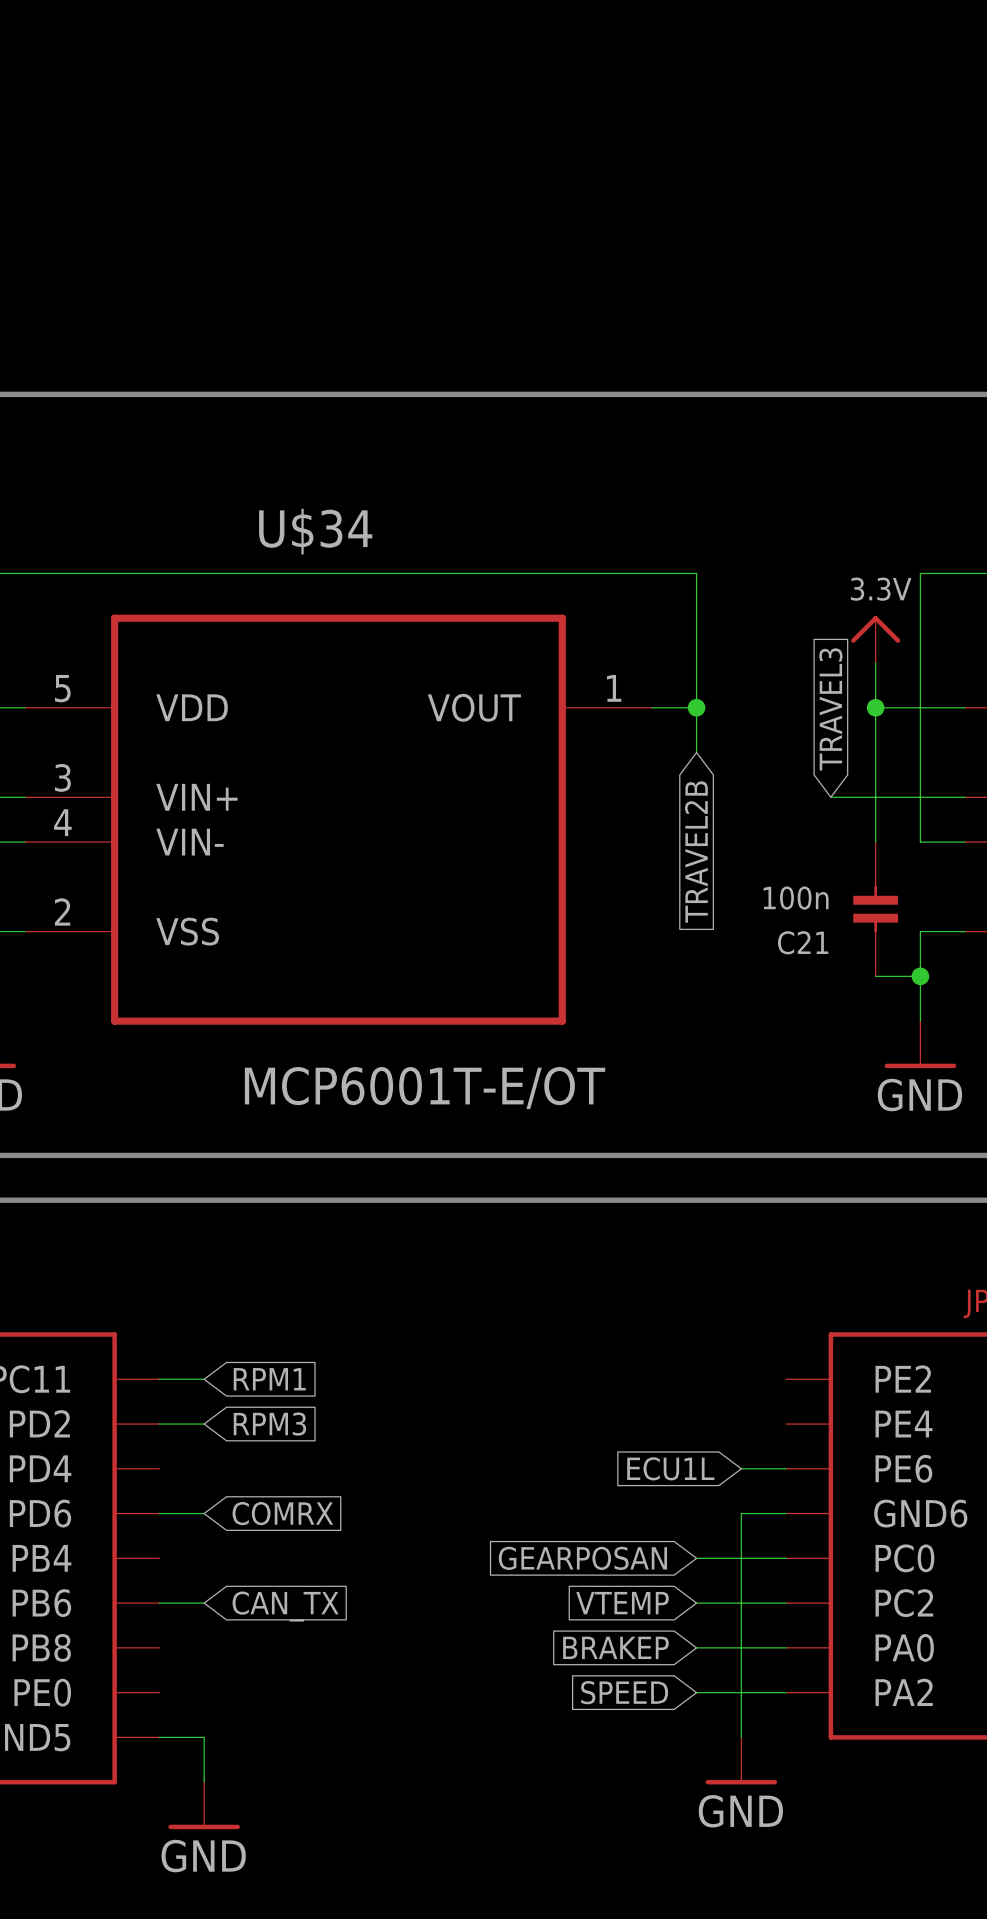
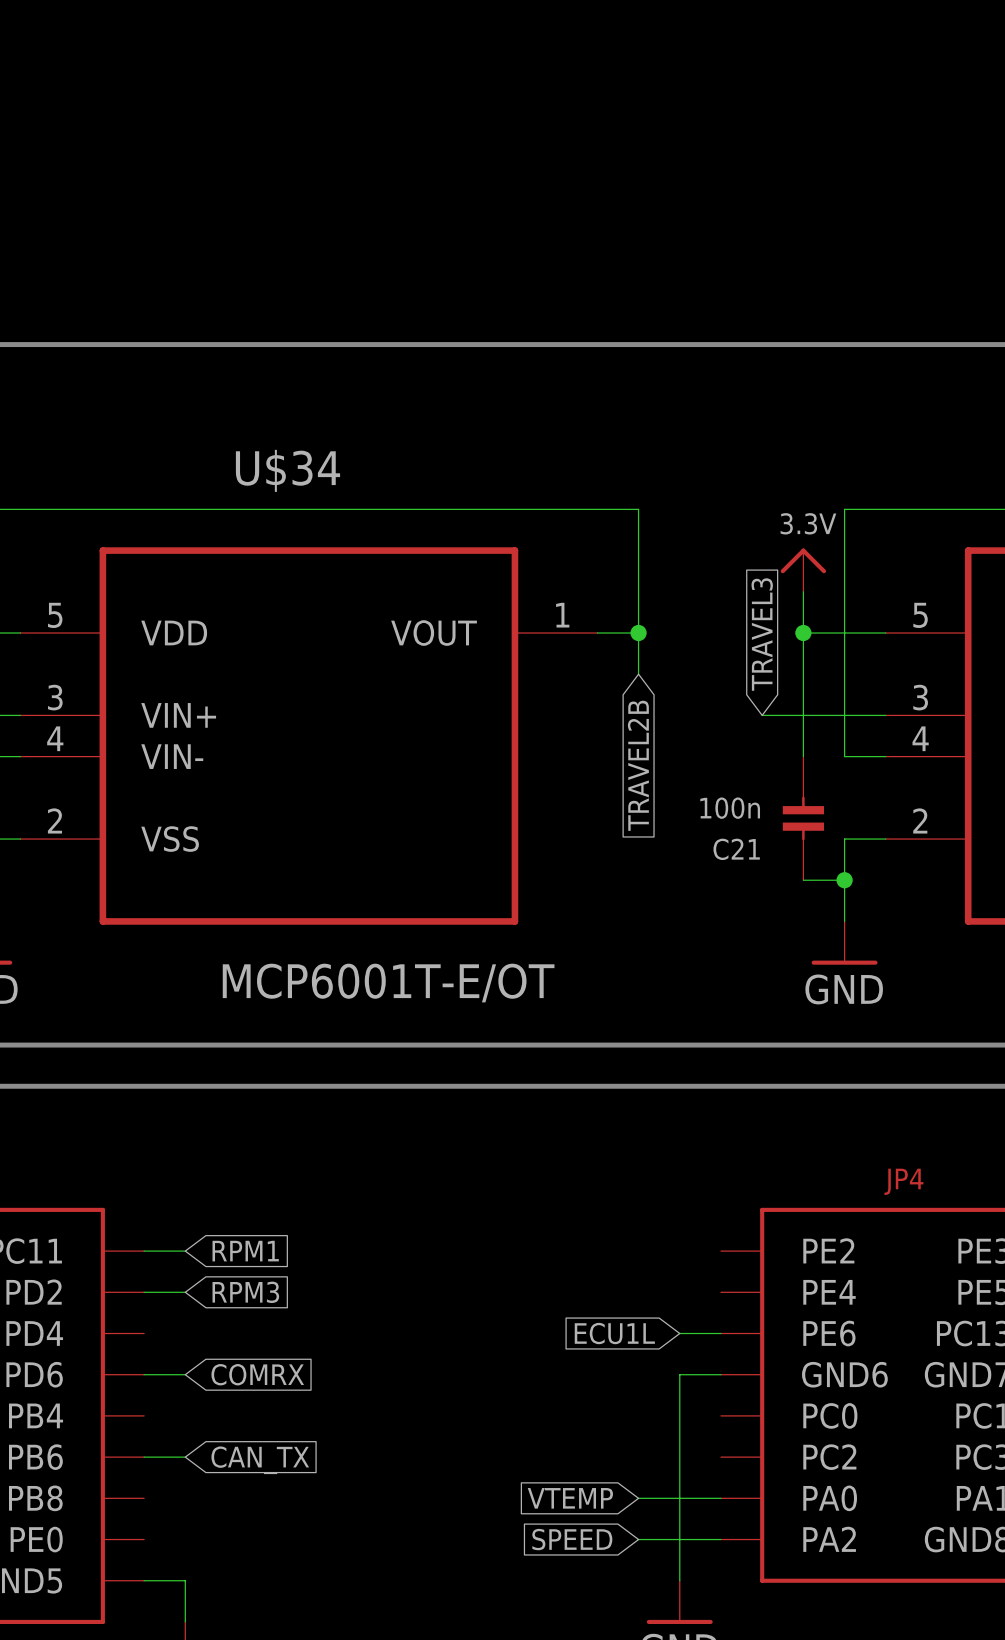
global label: GEARPOSAN (582, 1558) -> none
wire: (696, 1558) (786, 1558) -> none
global label: VTEMP (622, 1603) -> none
wire: (696, 1603) (786, 1603) -> none
global label: BRAKEP (615, 1647) -> VTEMP (570, 1498)

